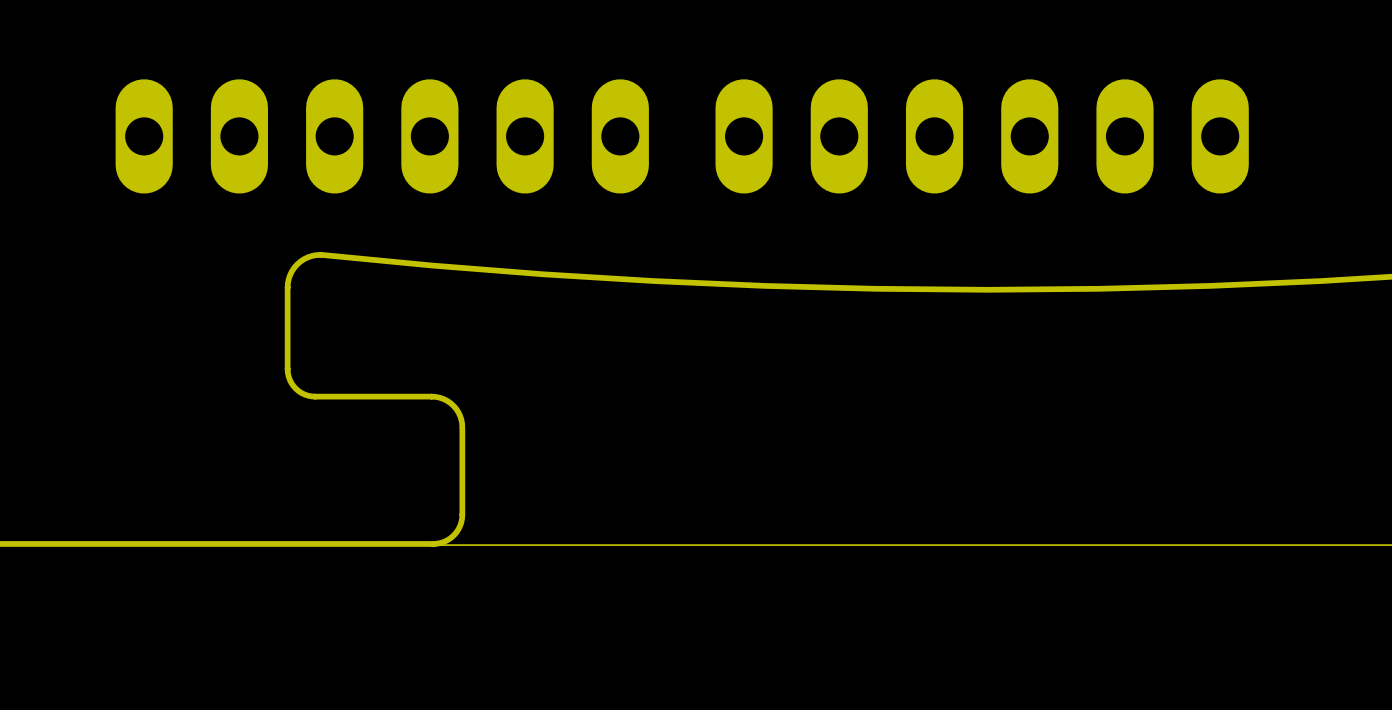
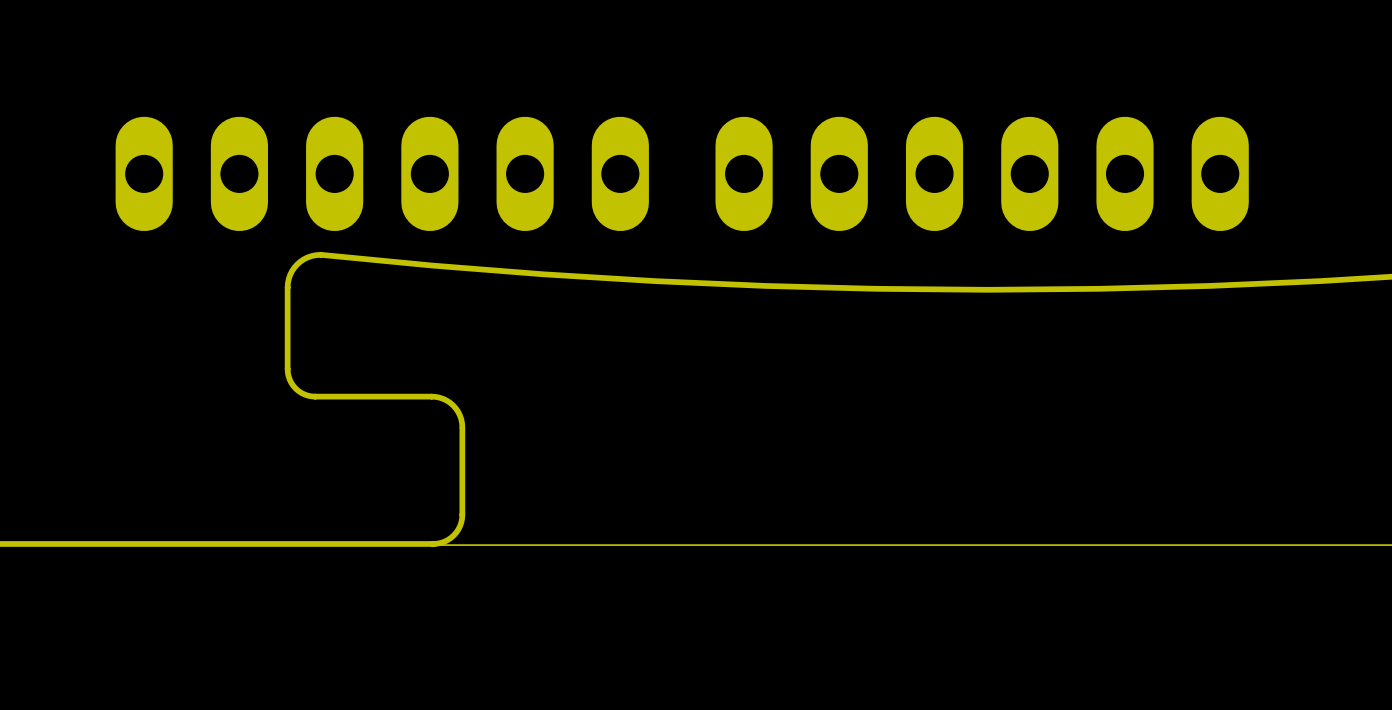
part position: (382, 136) -> (382, 173)
part position: (982, 136) -> (982, 173)

